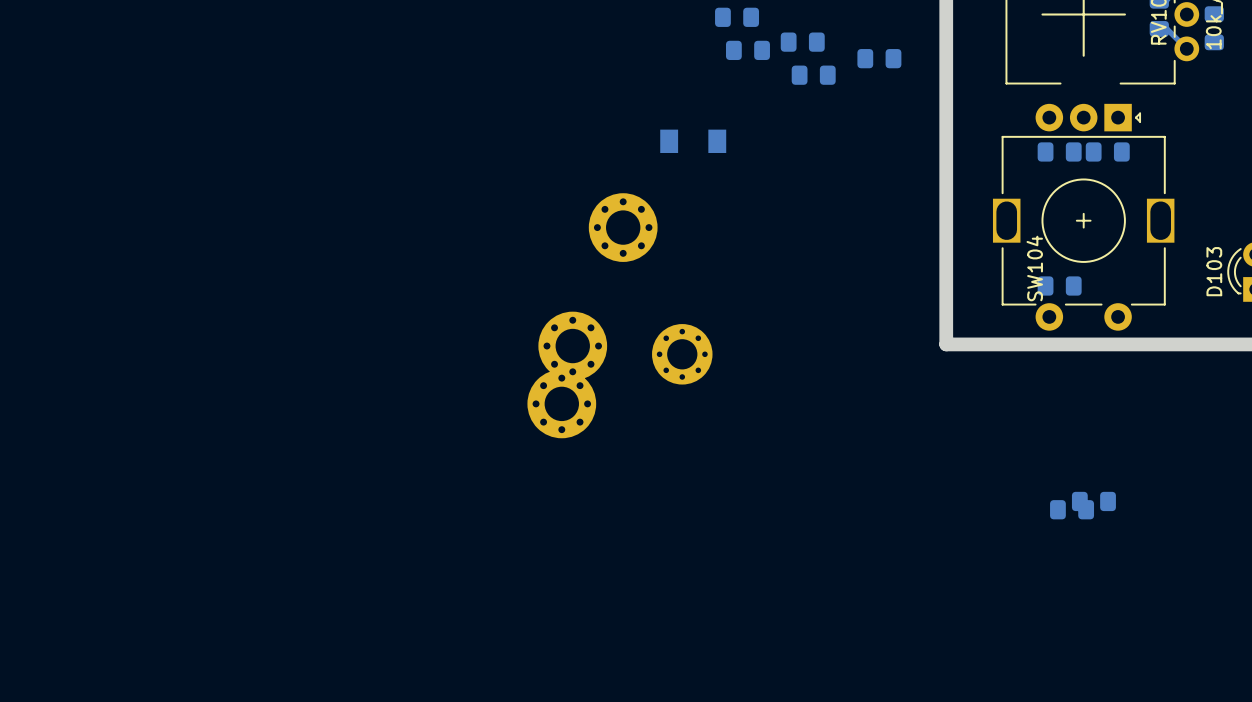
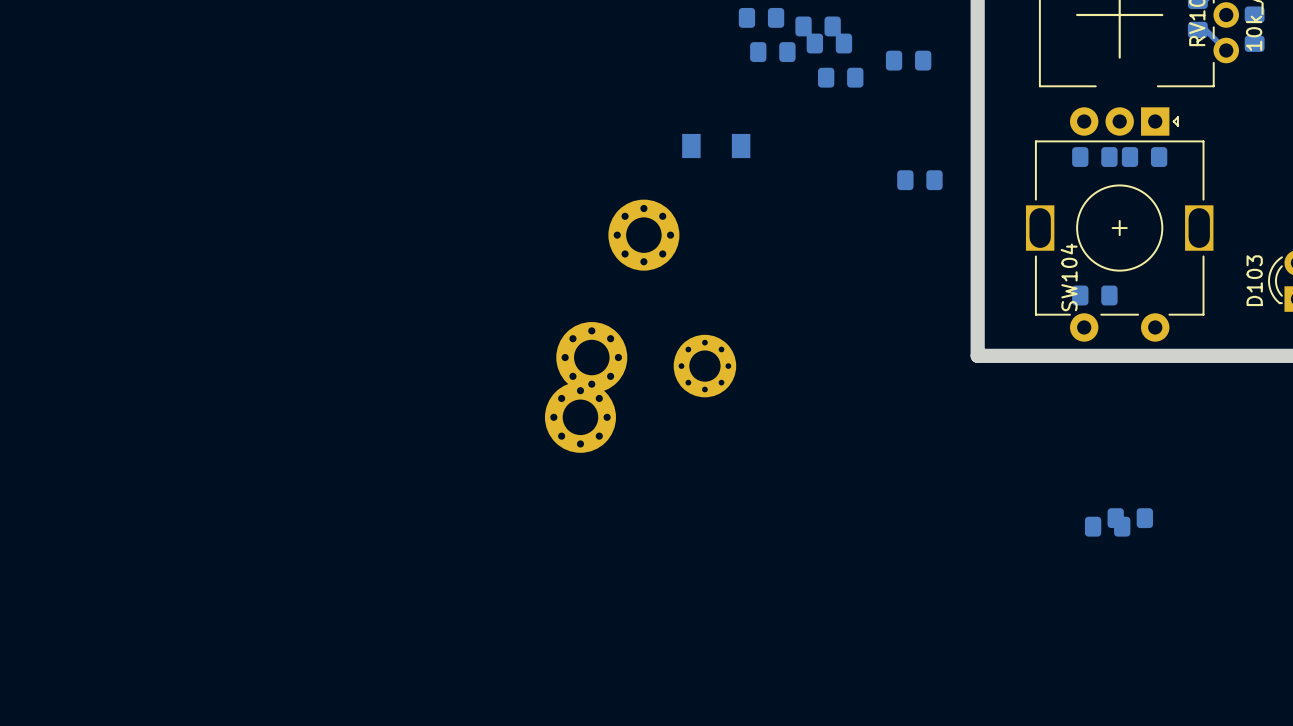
part: none -> (818, 26)
part: none -> (919, 180)

